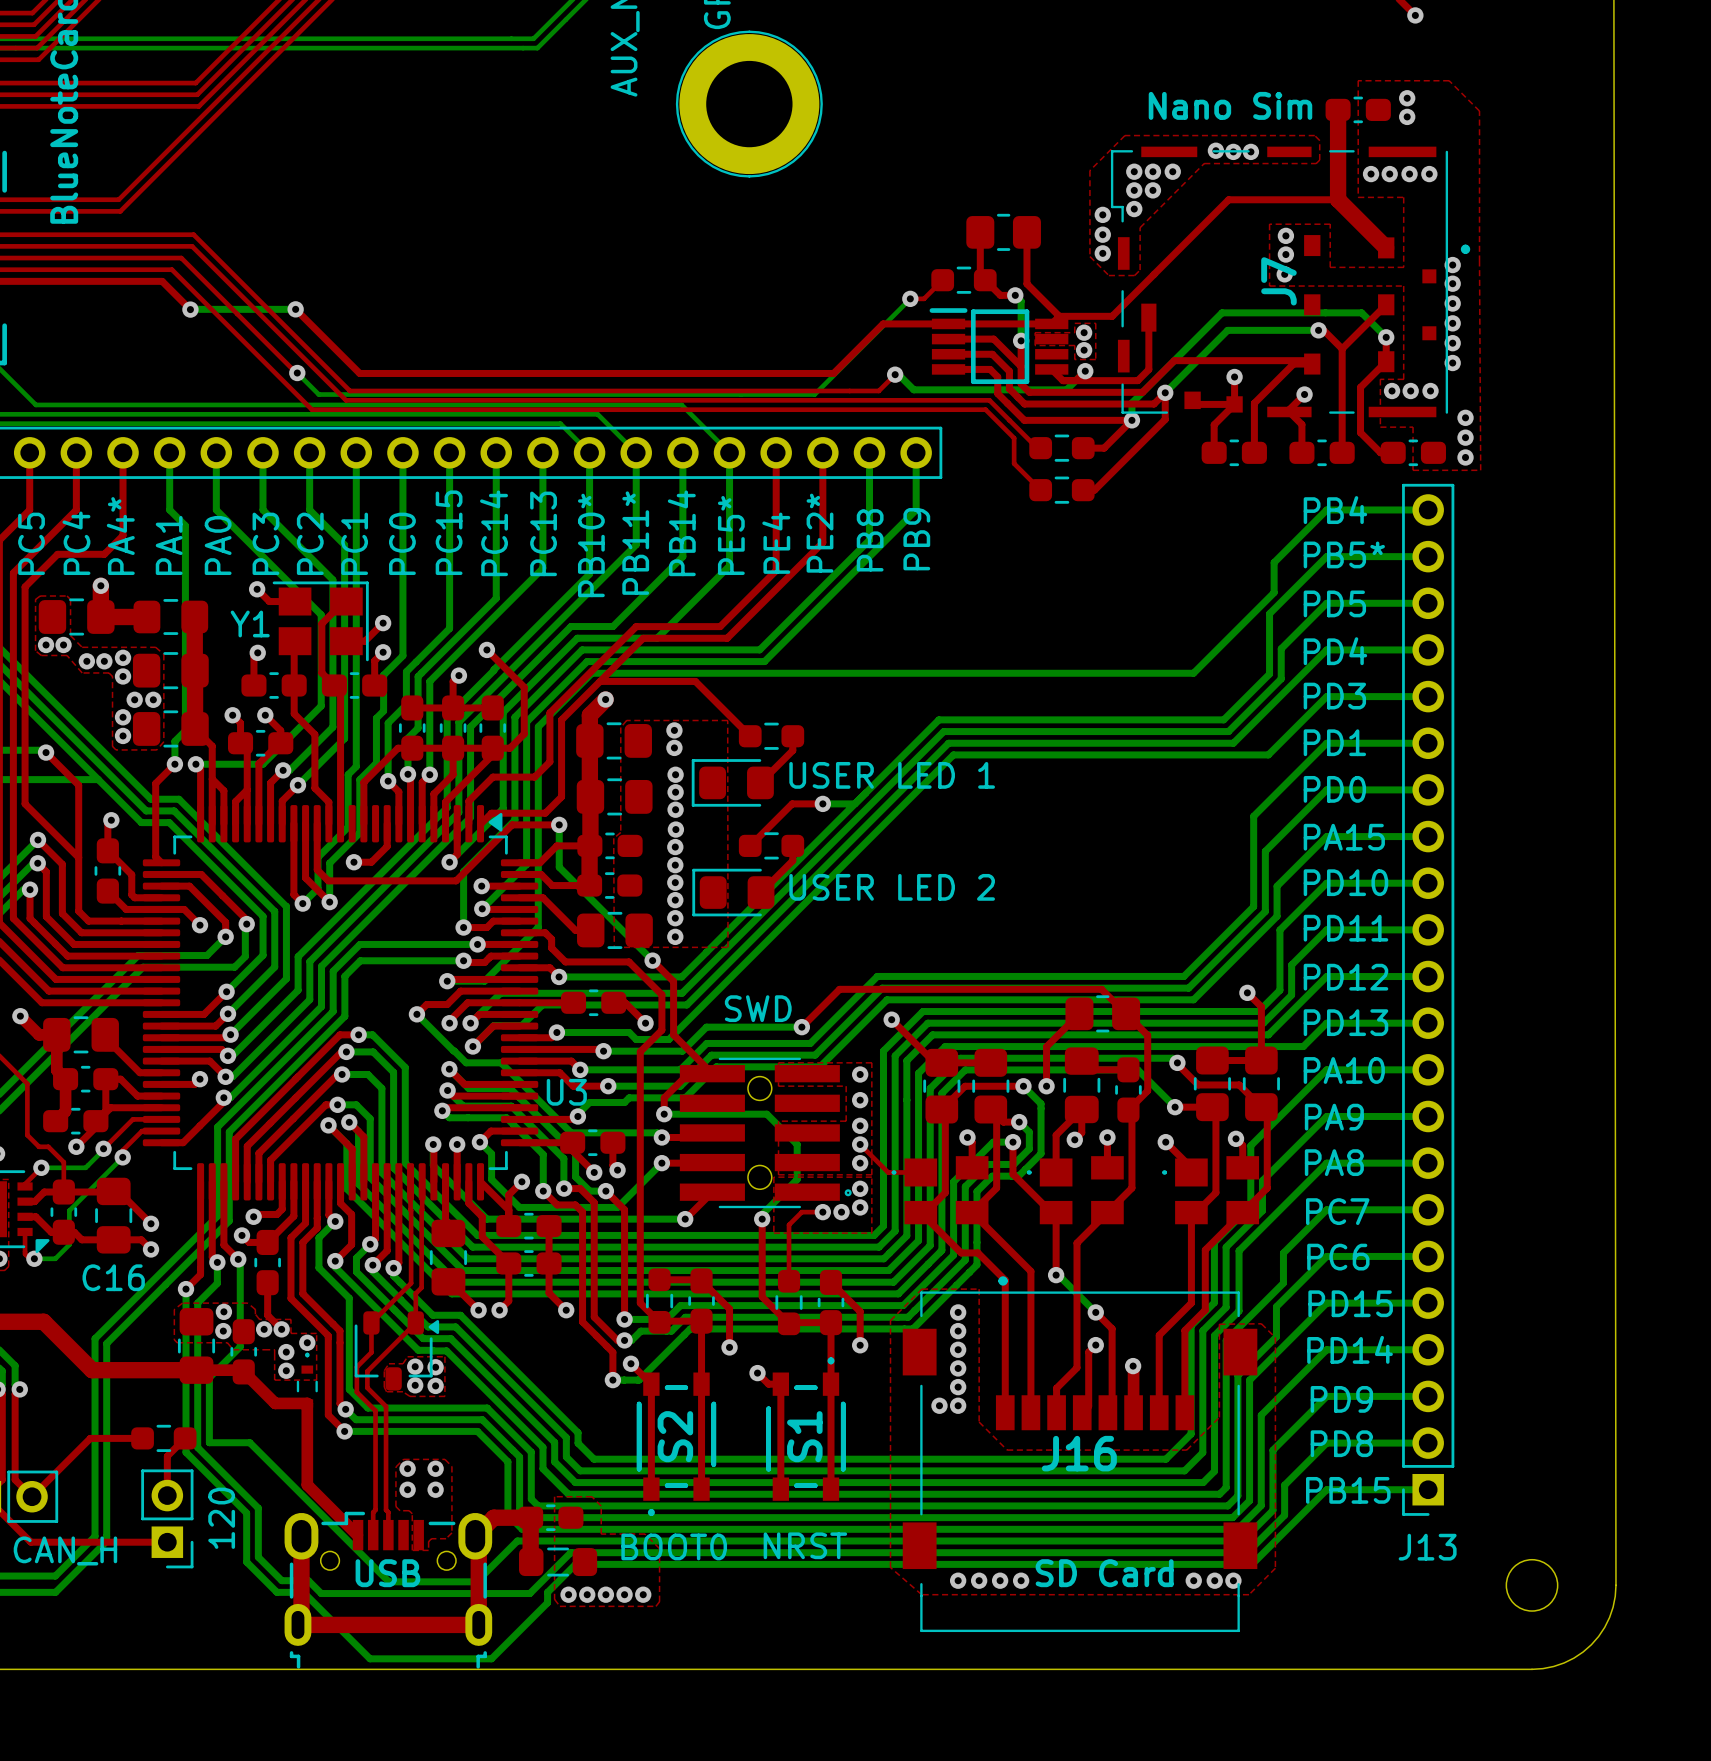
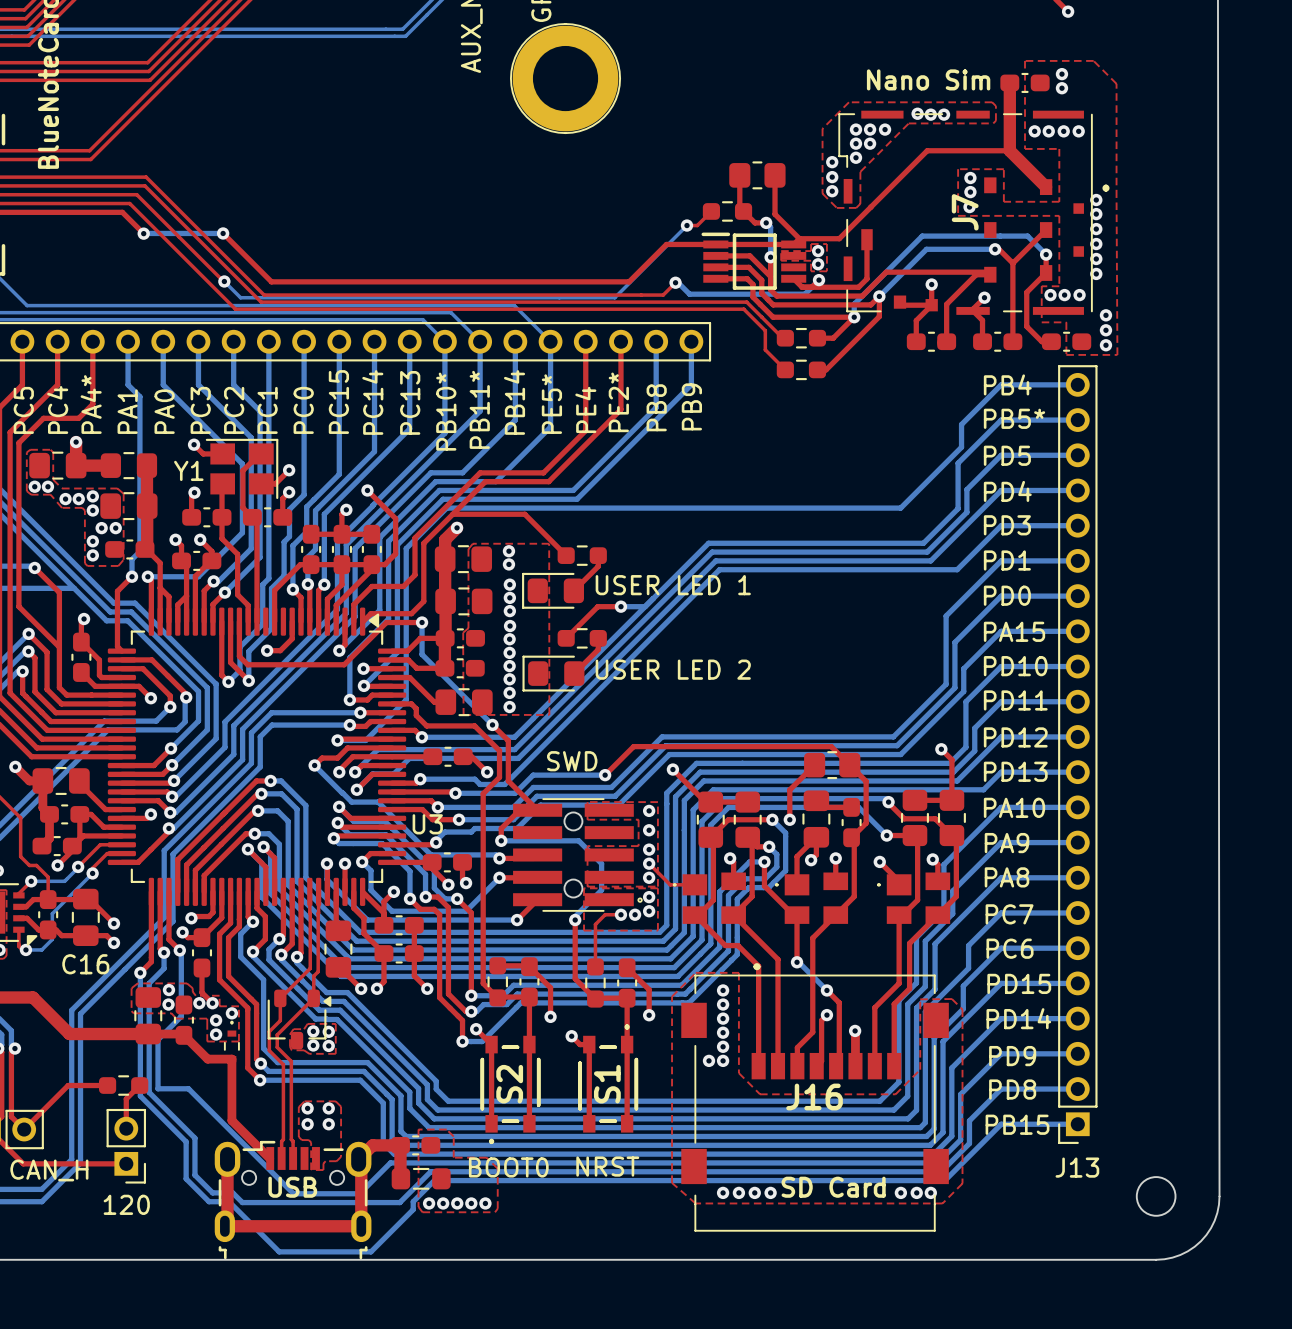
part footprint: [132, 710, 209, 748] -> [105, 539, 155, 560]
text rotation: 0° (221, 1518) -> 90° clockwise (126, 1204)
text position: 120 (221, 1518) -> 120 (126, 1204)

